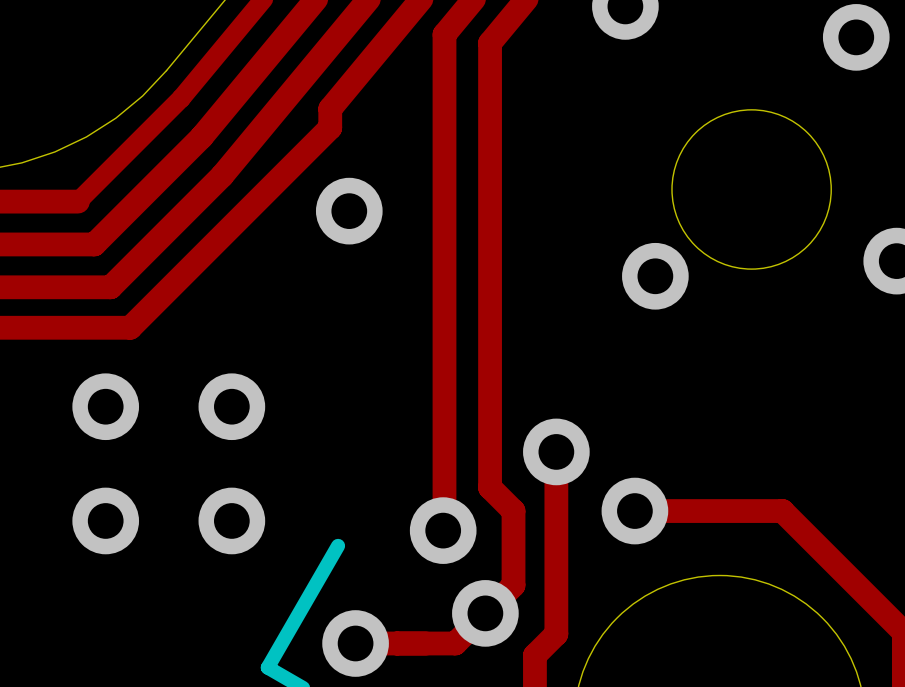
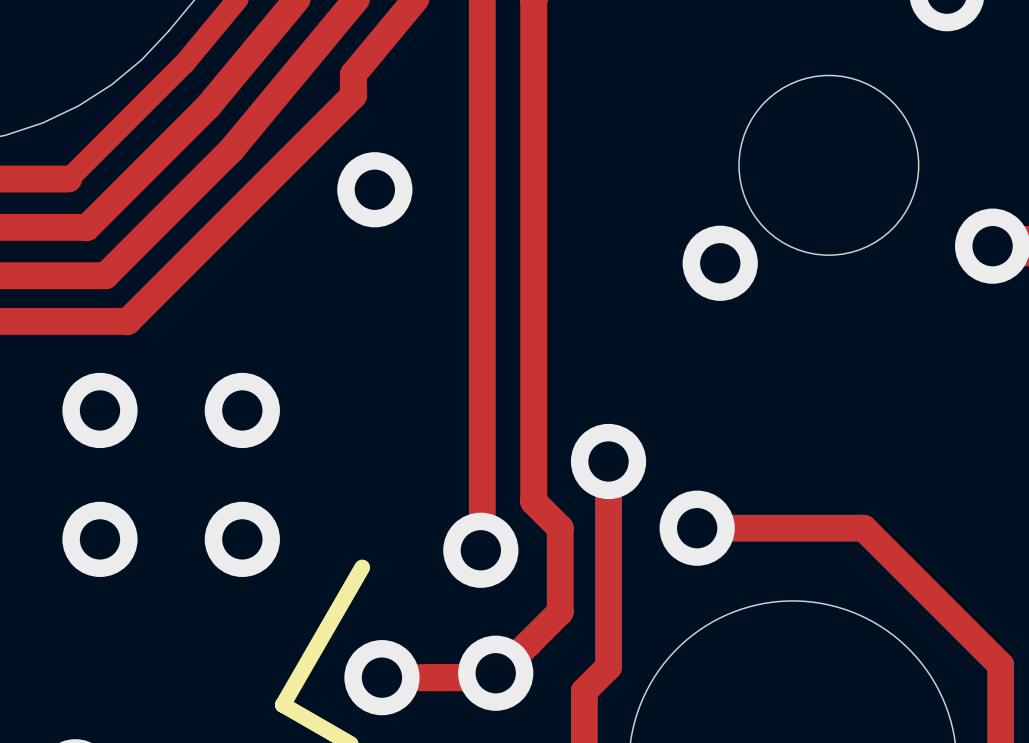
via position: (485, 613) -> (495, 673)

